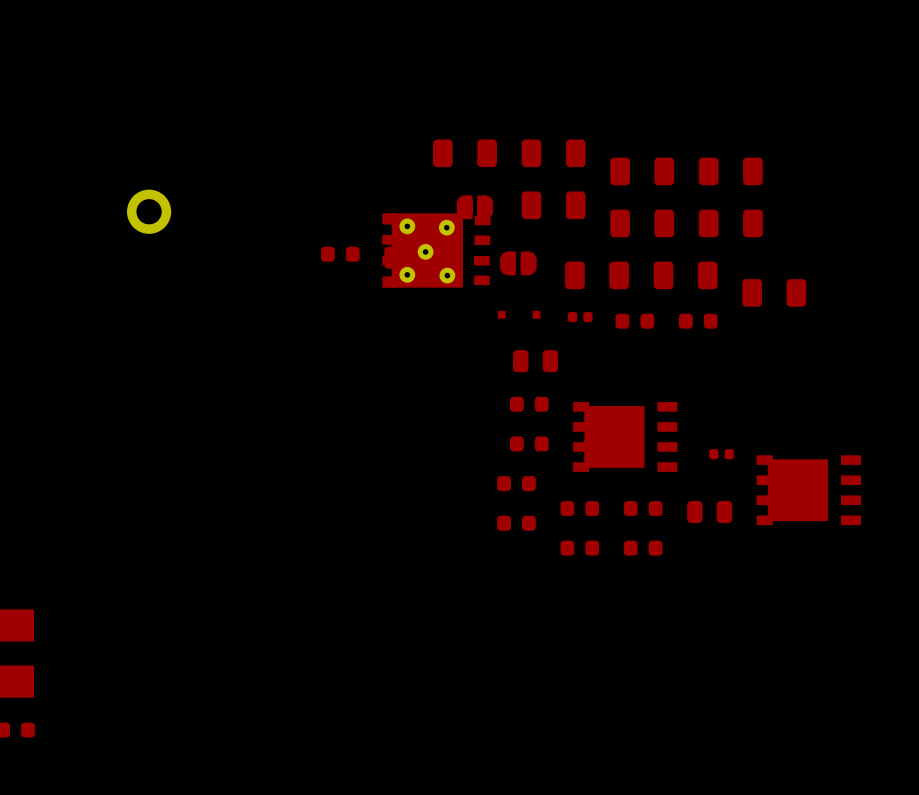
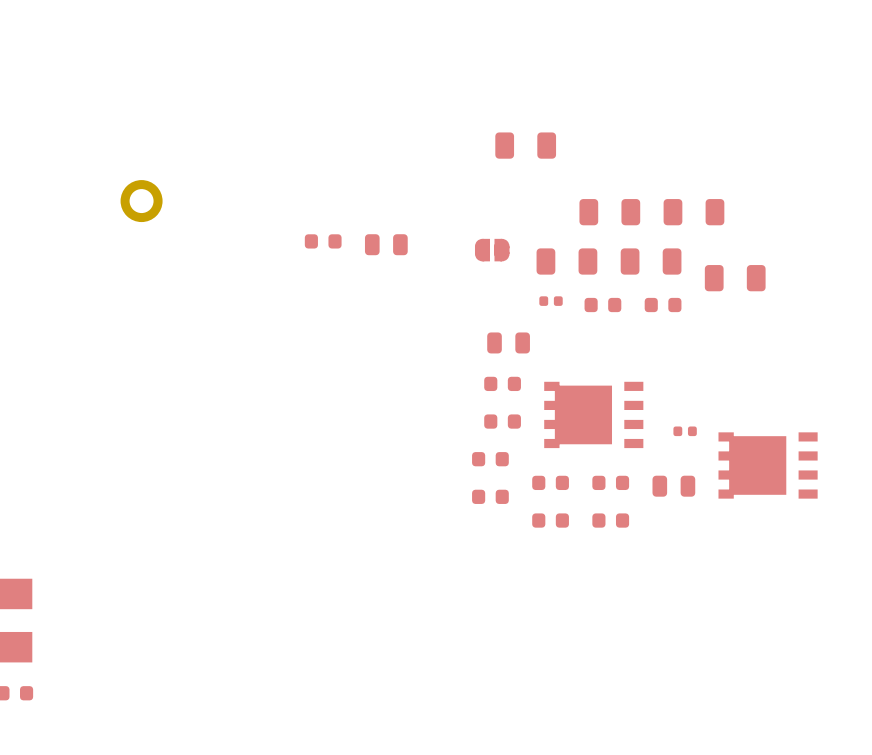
part: (464, 153) -> none
part: (642, 171) -> none
part: (730, 171) -> none
part: (553, 205) -> none
part: (474, 207) -> none
part: (436, 250) -> none
part: (519, 314) -> none

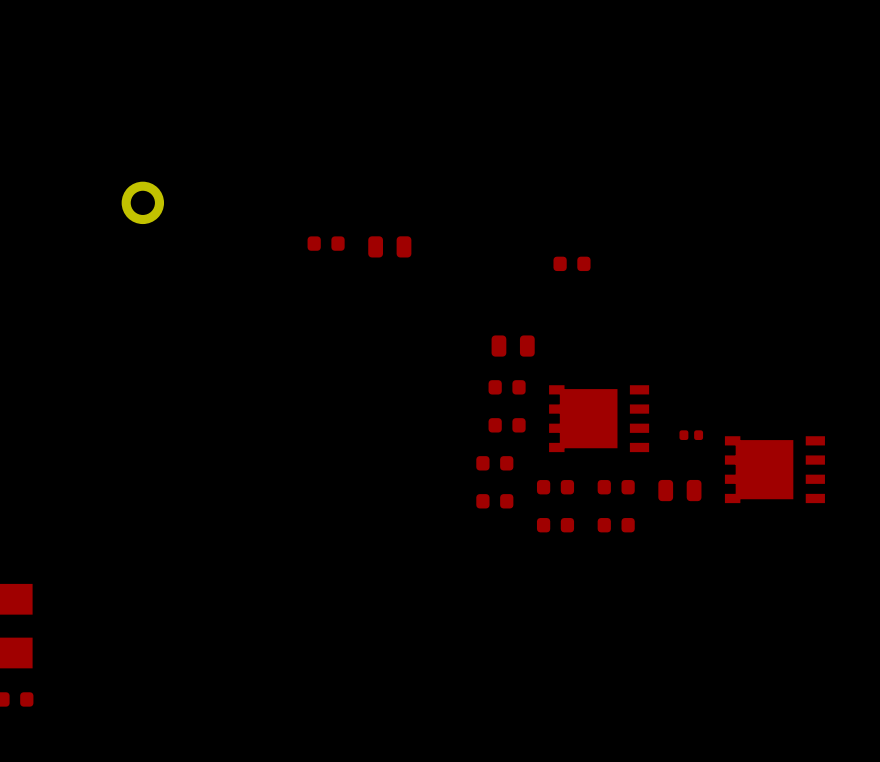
part: (525, 145) -> none
part: (609, 212) -> none
part: (693, 212) -> none
part footprint: [536, 248, 598, 275] -> [553, 256, 591, 272]
part: (492, 250) -> none
part: (651, 261) -> none
part: (735, 278) -> none
part: (551, 301) -> none
part: (602, 305) -> none
part: (663, 305) -> none

